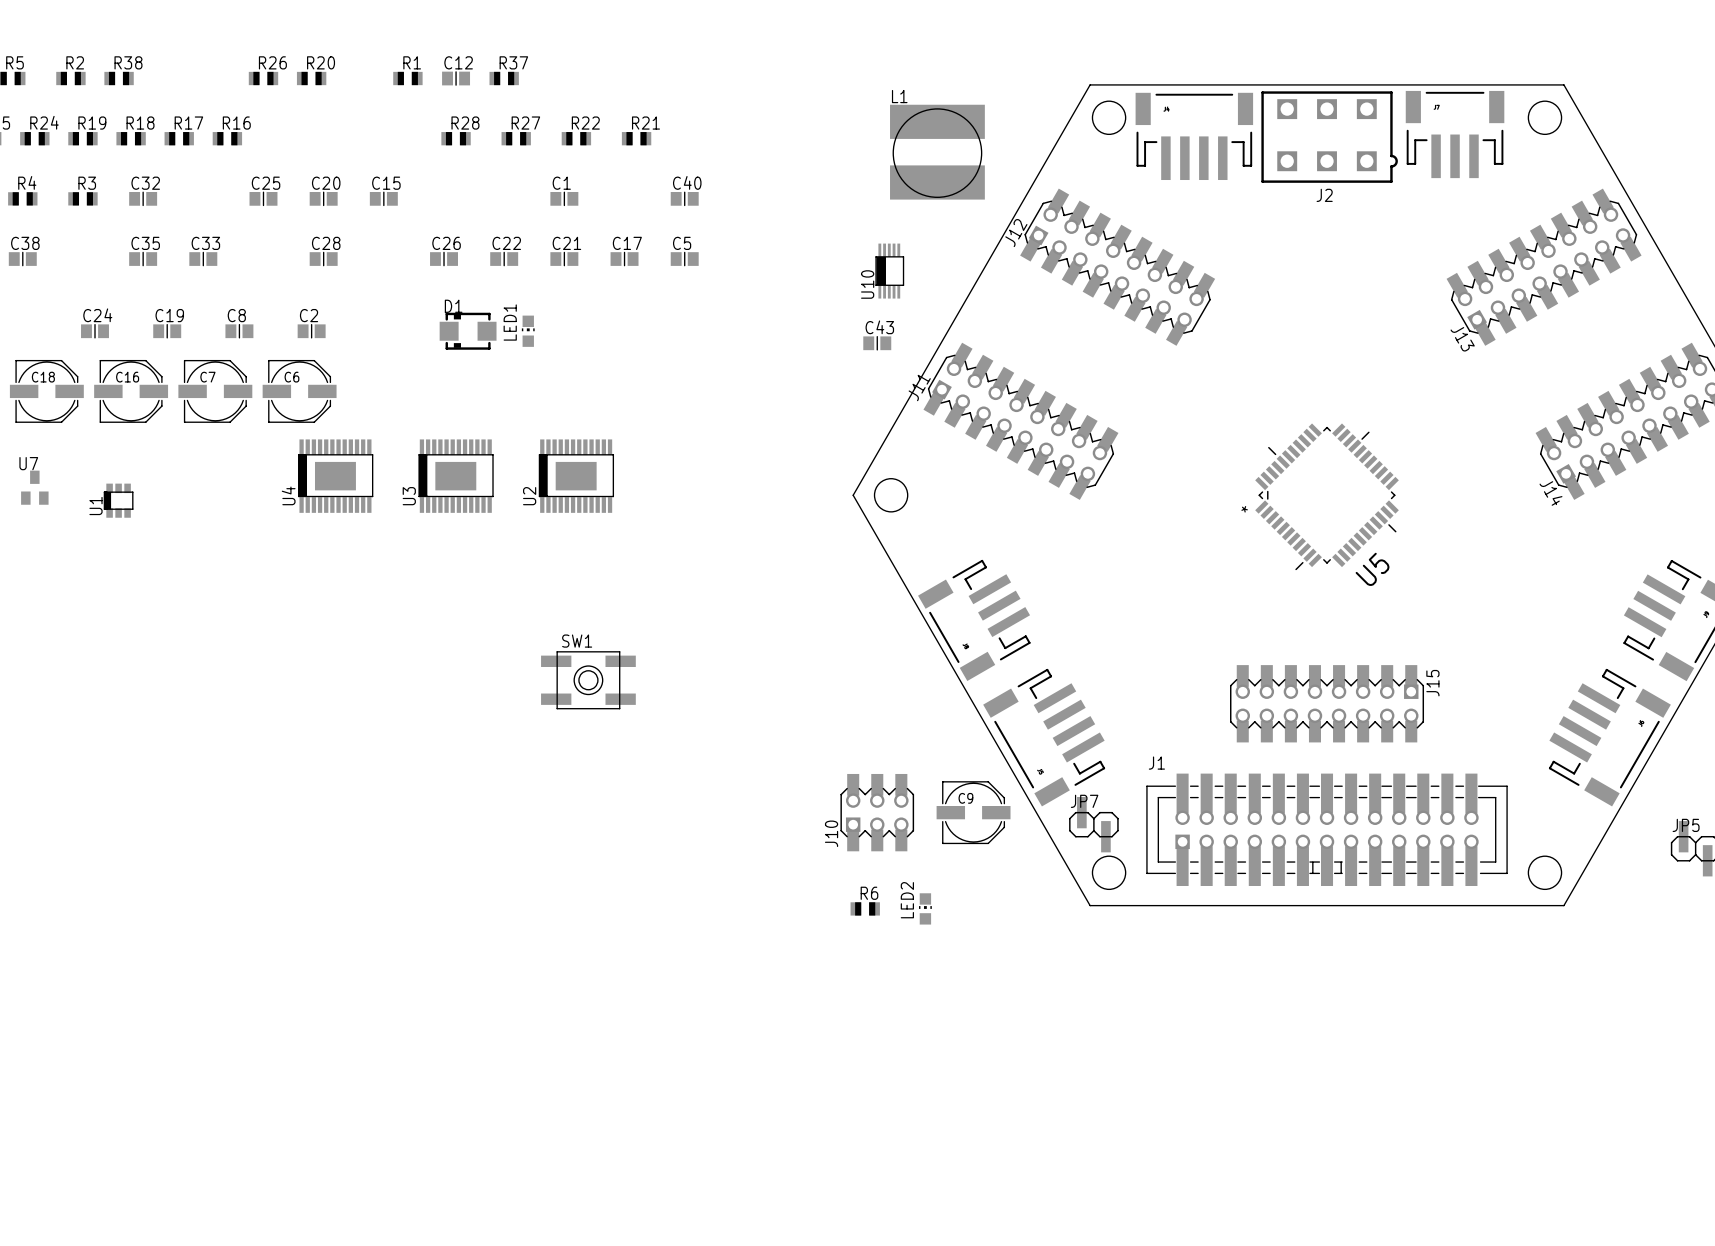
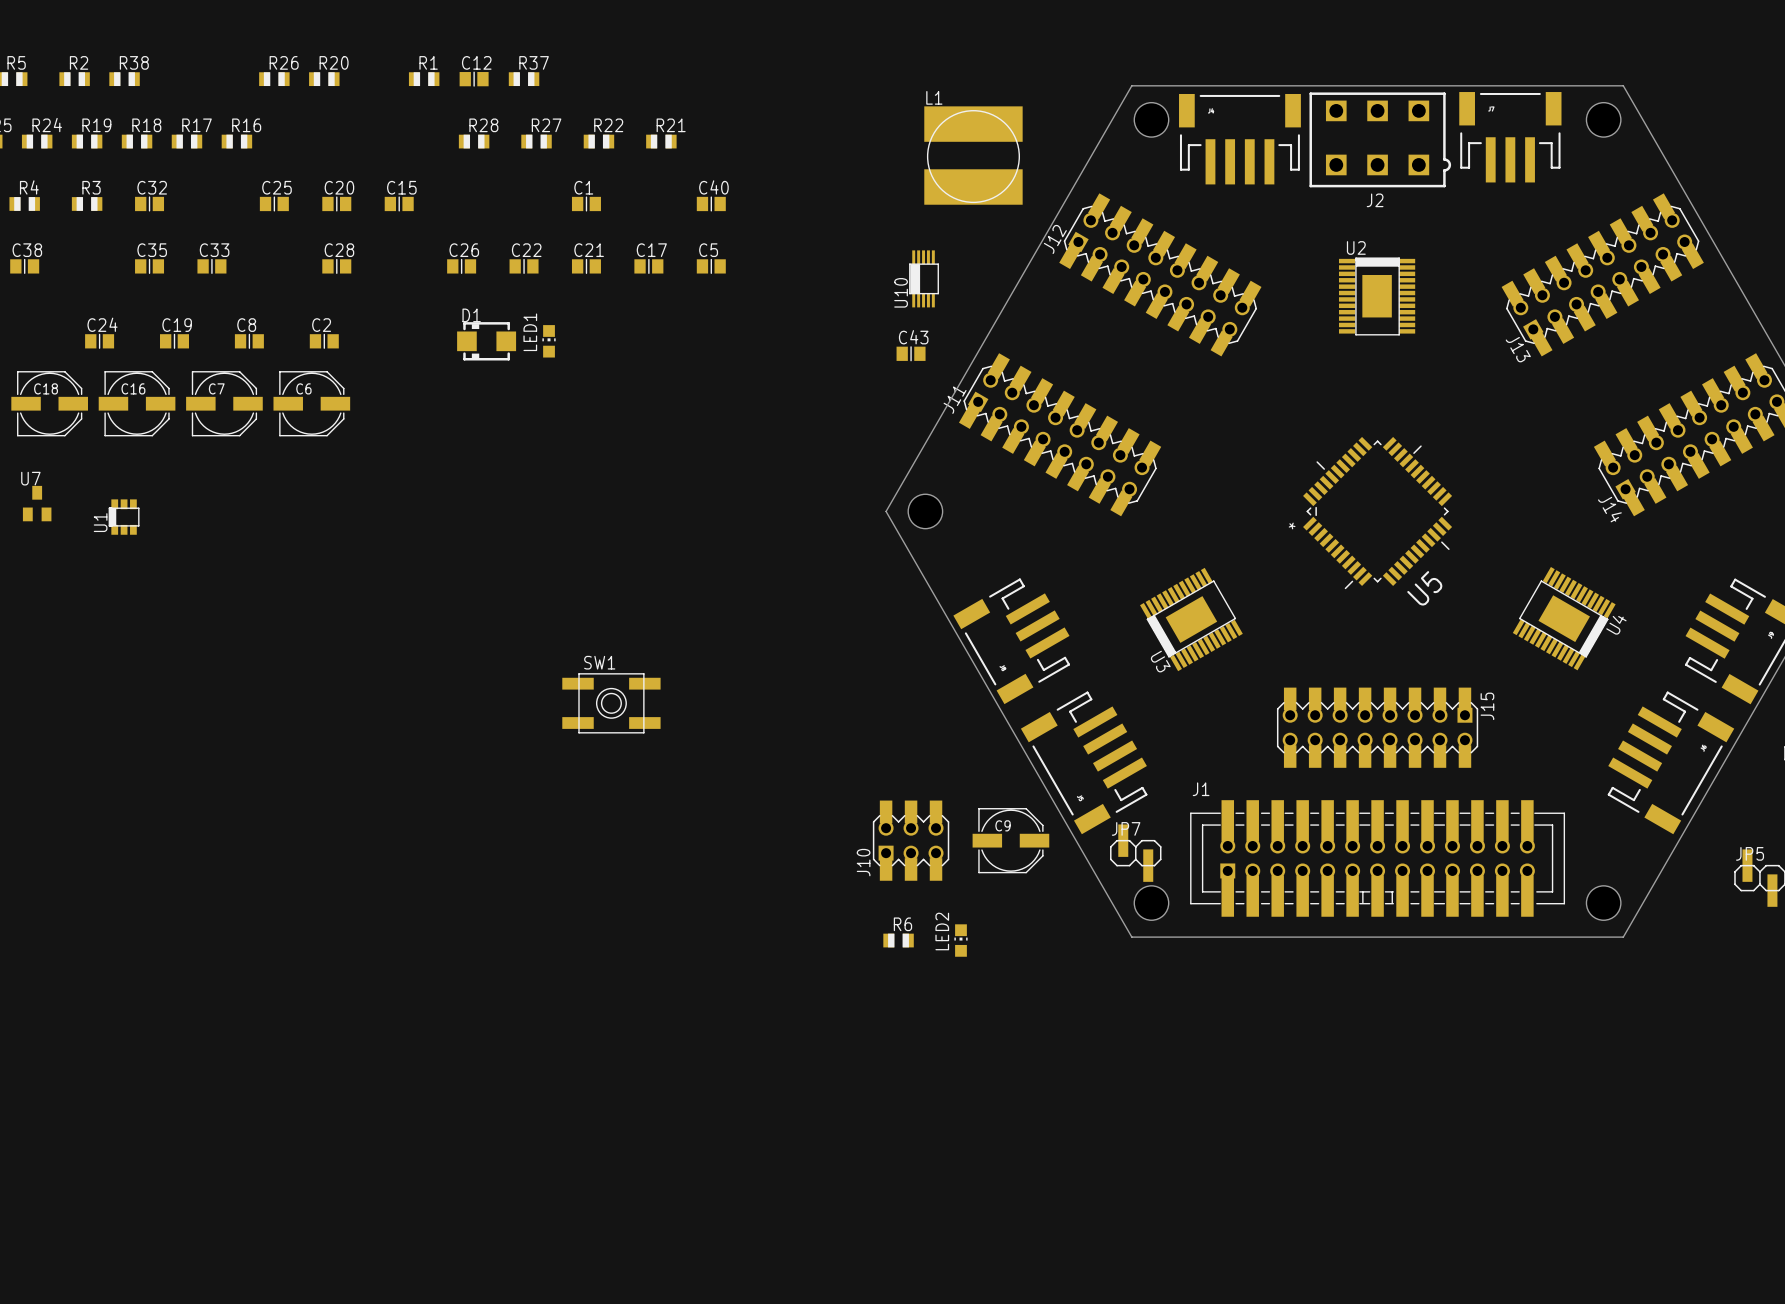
U4 rotation: 0° (335, 476) -> 150° counterclockwise (1564, 618)
U4 position: (335, 476) -> (1564, 618)
U3 rotation: 0° (456, 476) -> 30° counterclockwise (1191, 619)
U3 position: (456, 476) -> (1191, 619)
U2 rotation: 0° (576, 476) -> 90° clockwise (1377, 296)
U2 position: (576, 476) -> (1377, 296)

